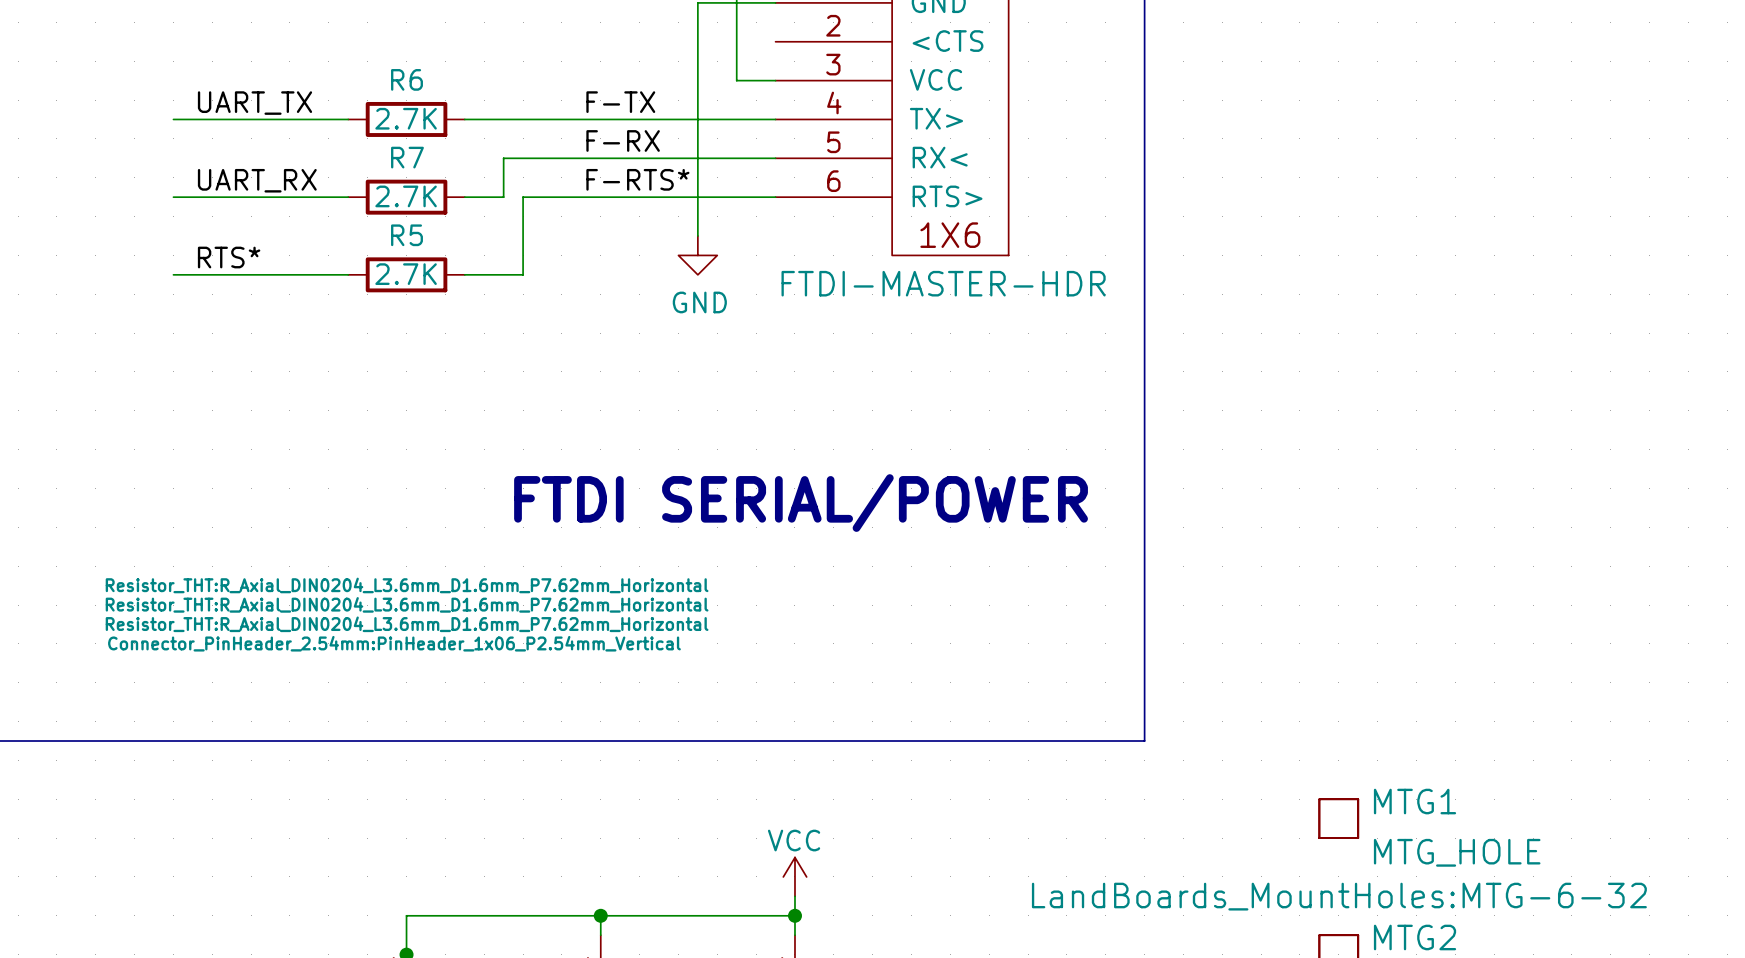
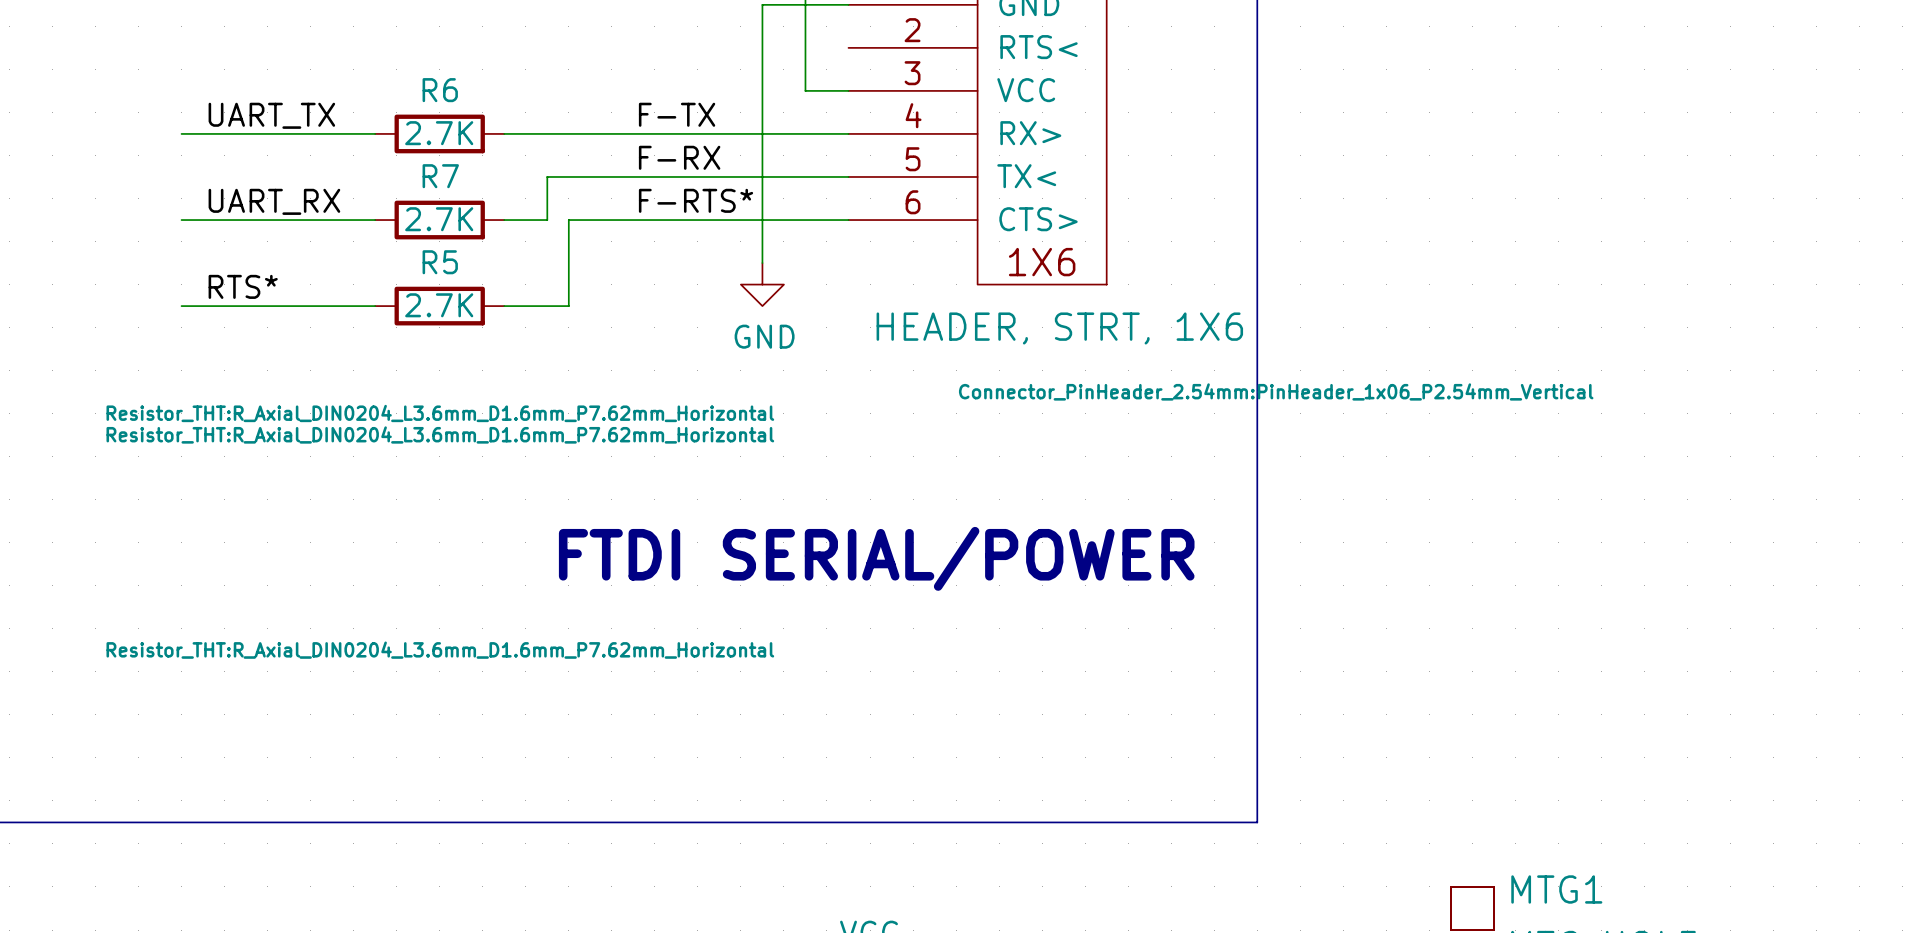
part pin name: <CTS (948, 41) -> RTS< (1039, 47)
part pin name: TX> (936, 118) -> RX> (1030, 133)
part pin name: RX< (940, 157) -> TX< (1026, 176)
part pin name: RTS> (947, 196) -> CTS> (1038, 219)
part value: FTDI-MASTER-HDR (943, 283) -> HEADER, STRT, 1X6 (1059, 328)
R6 text position: Resistor_THT:R_Axial_DIN0204_L3.6mm_D1.6mm_P7.62mm_Horizontal (407, 585) -> Resistor_THT:R_Axial_DIN0204_L3.6mm_D1.6mm_P7.62mm_Horizontal (440, 413)
R7 text position: Resistor_THT:R_Axial_DIN0204_L3.6mm_D1.6mm_P7.62mm_Horizontal (407, 604) -> Resistor_THT:R_Axial_DIN0204_L3.6mm_D1.6mm_P7.62mm_Horizontal (440, 434)
R5 text position: Resistor_THT:R_Axial_DIN0204_L3.6mm_D1.6mm_P7.62mm_Horizontal (407, 624) -> Resistor_THT:R_Axial_DIN0204_L3.6mm_D1.6mm_P7.62mm_Horizontal (440, 650)
part text position: Connector_PinHeader_2.54mm:PinHeader_1x06_P2.54mm_Vertical (394, 643) -> Connector_PinHeader_2.54mm:PinHeader_1x06_P2.54mm_Vertical (1276, 391)

